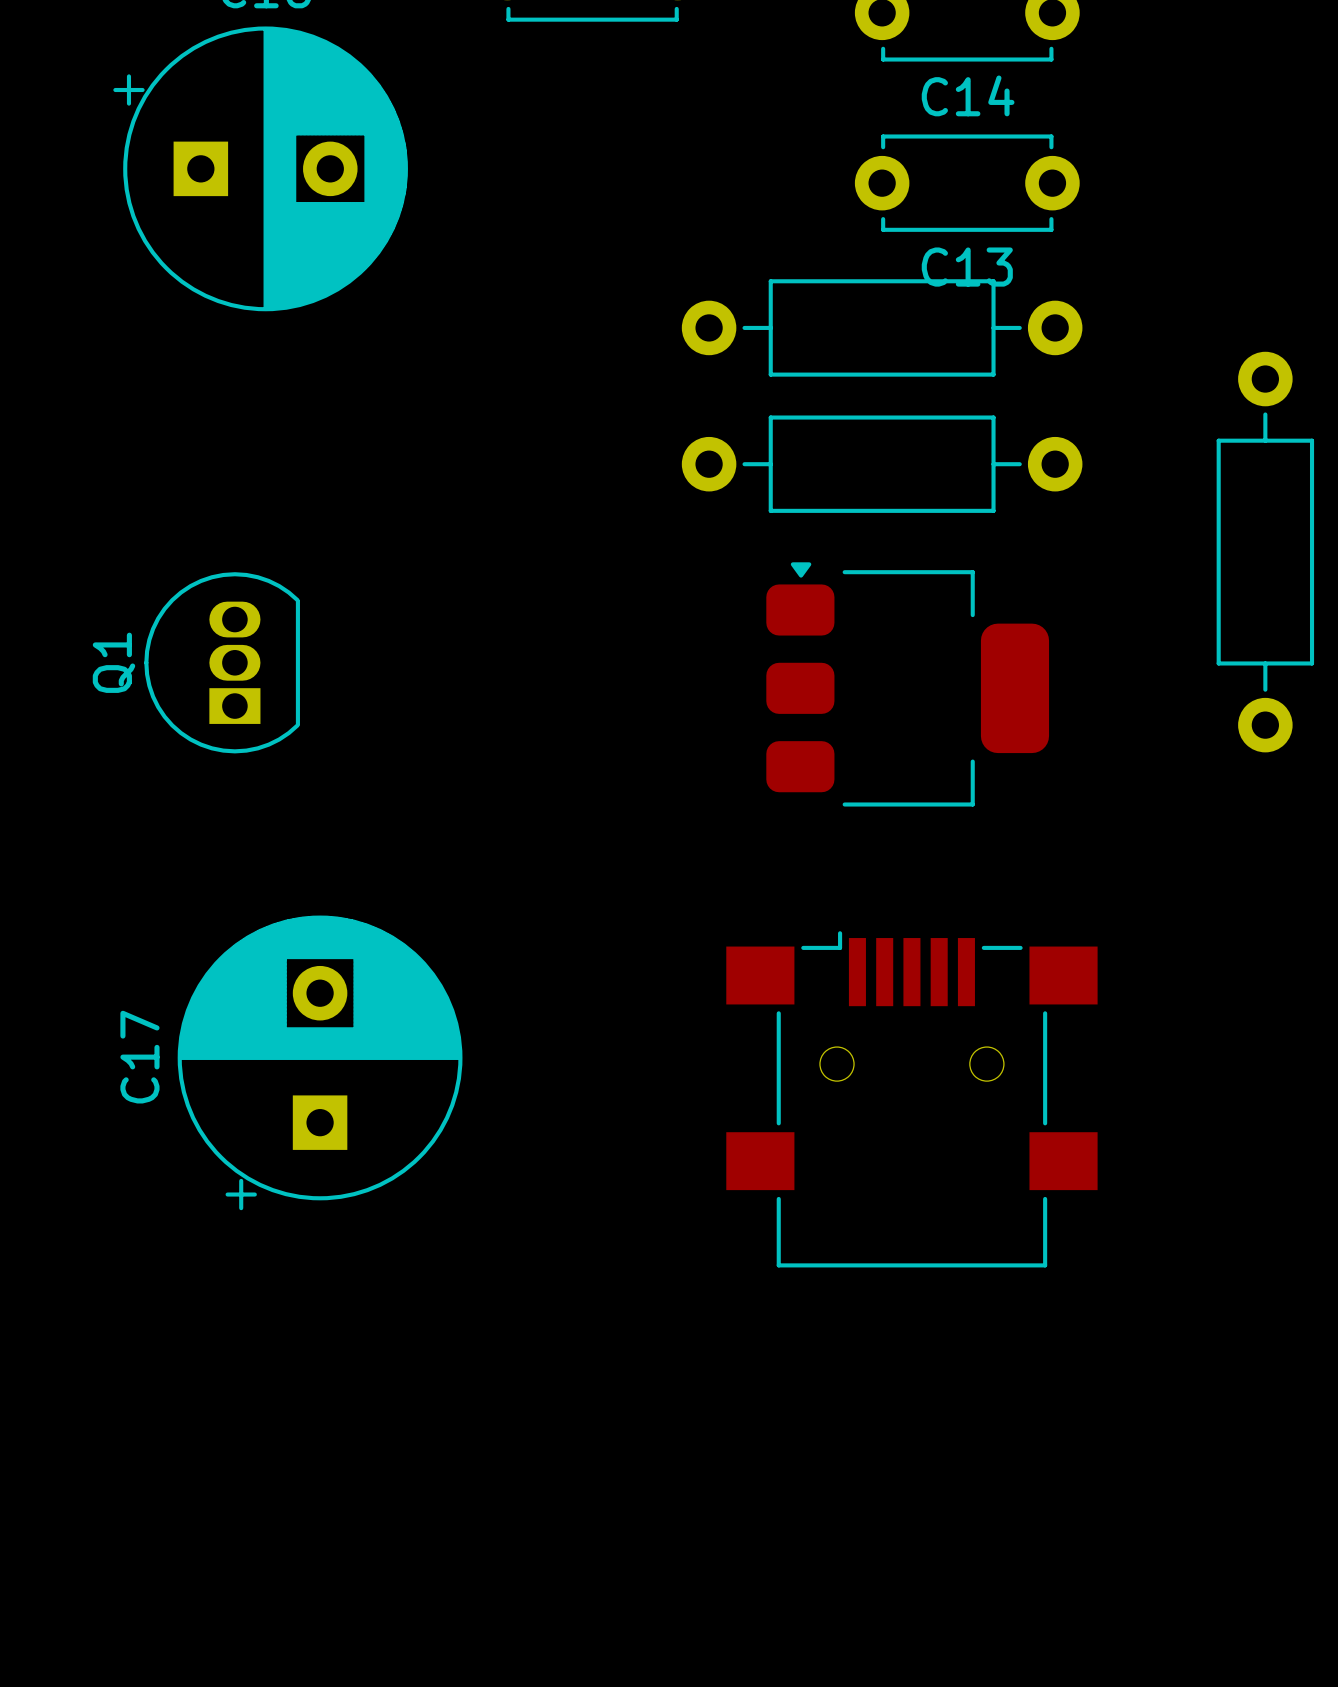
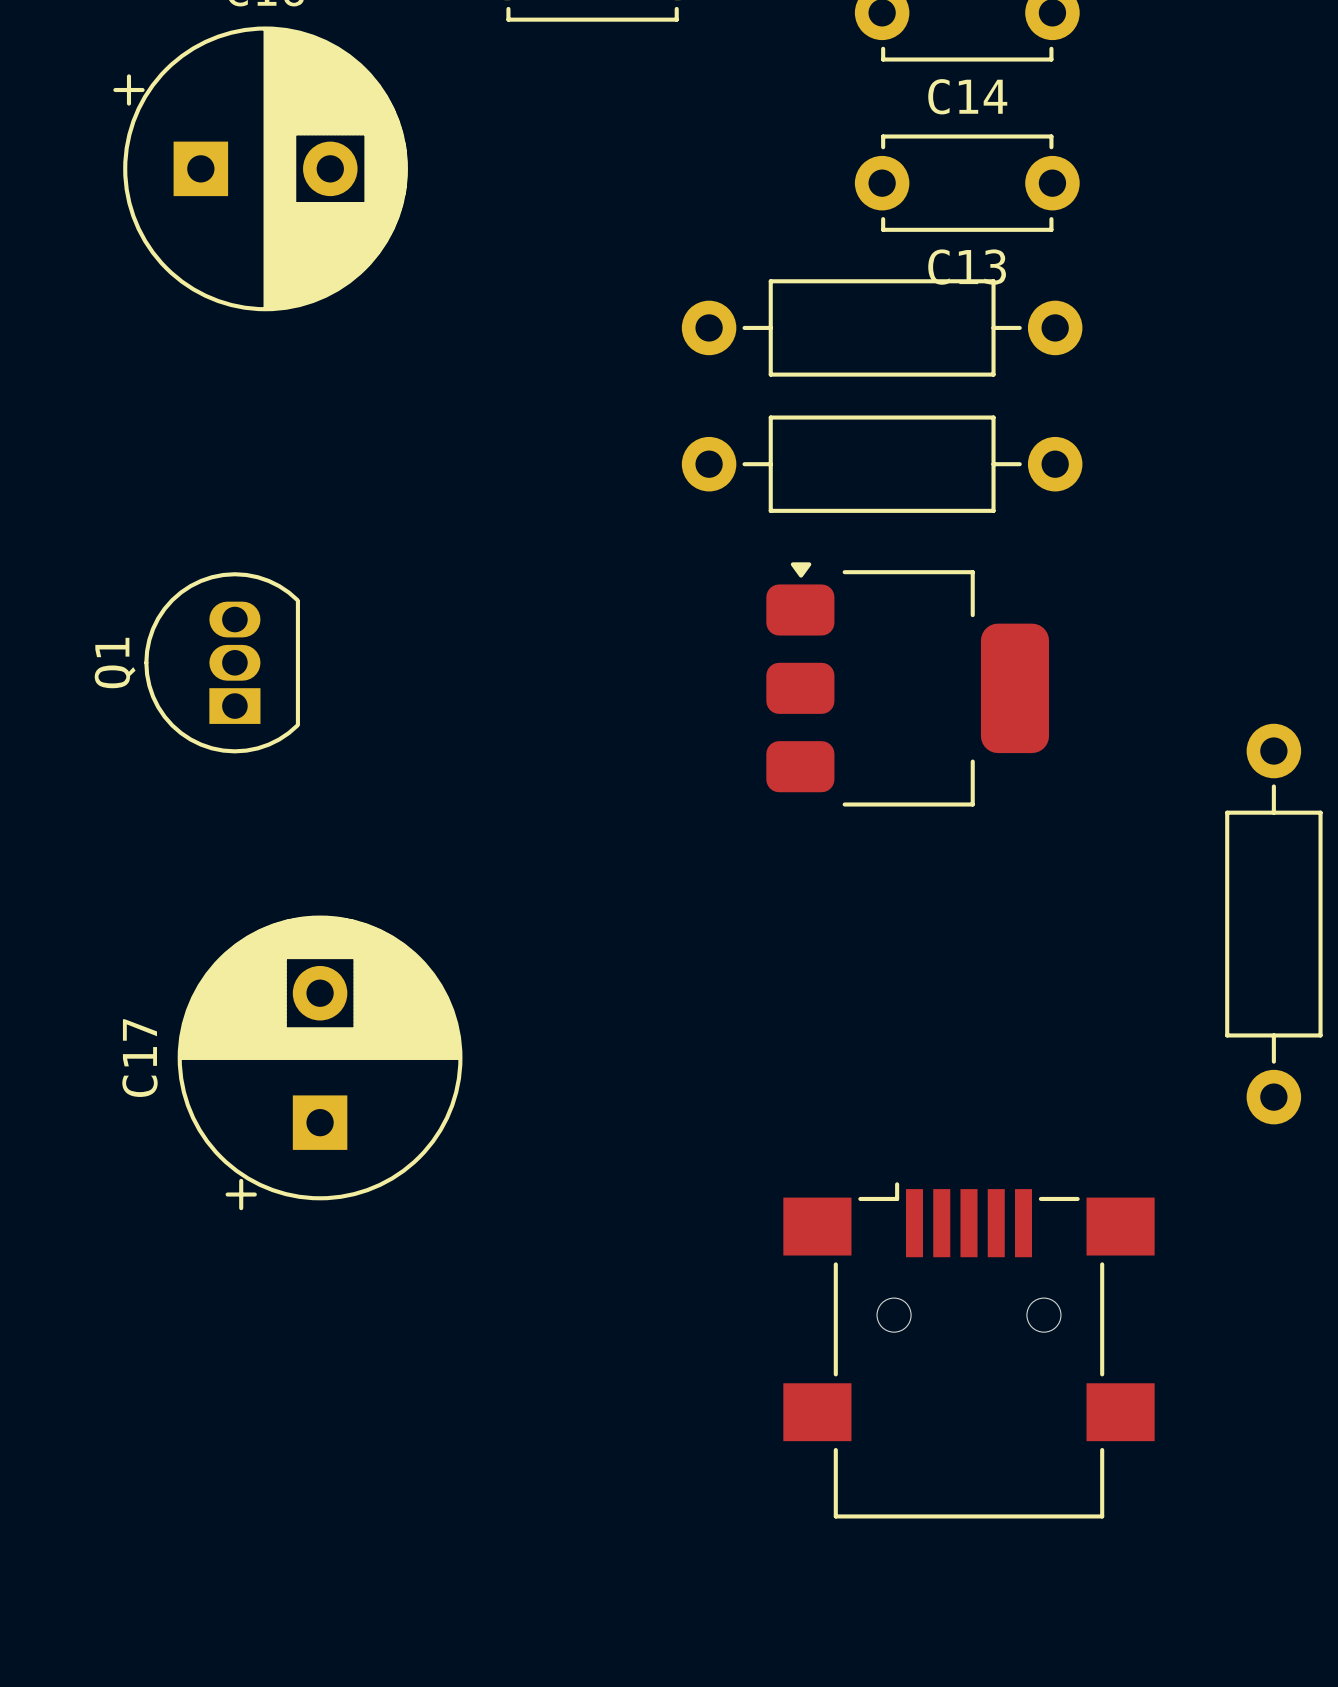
part: (1265, 552) -> none
part: none -> (1273, 924)
part position: (911, 1099) -> (969, 1350)

